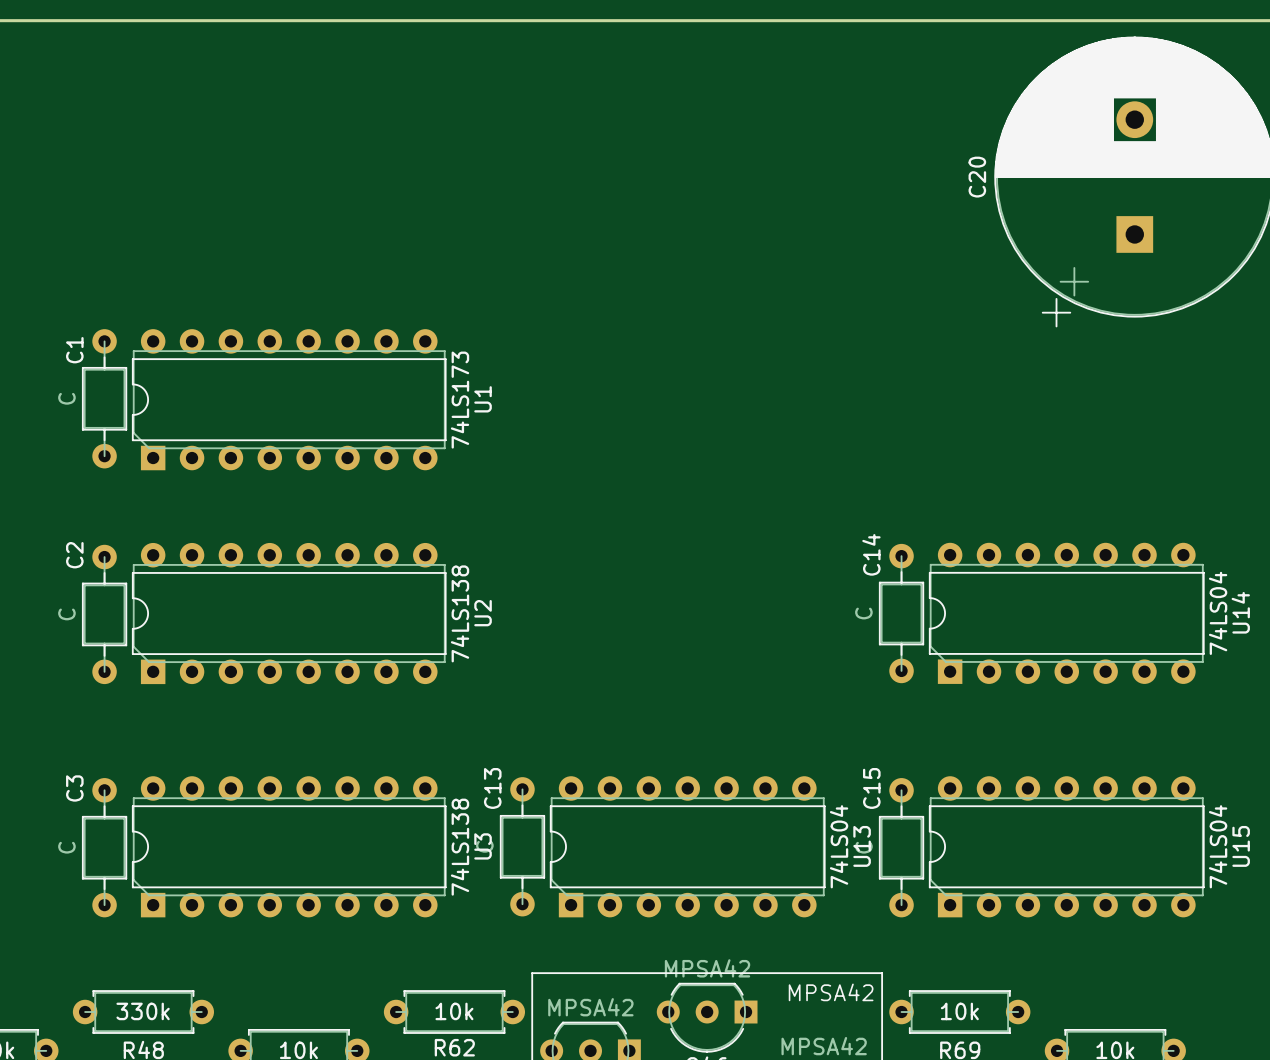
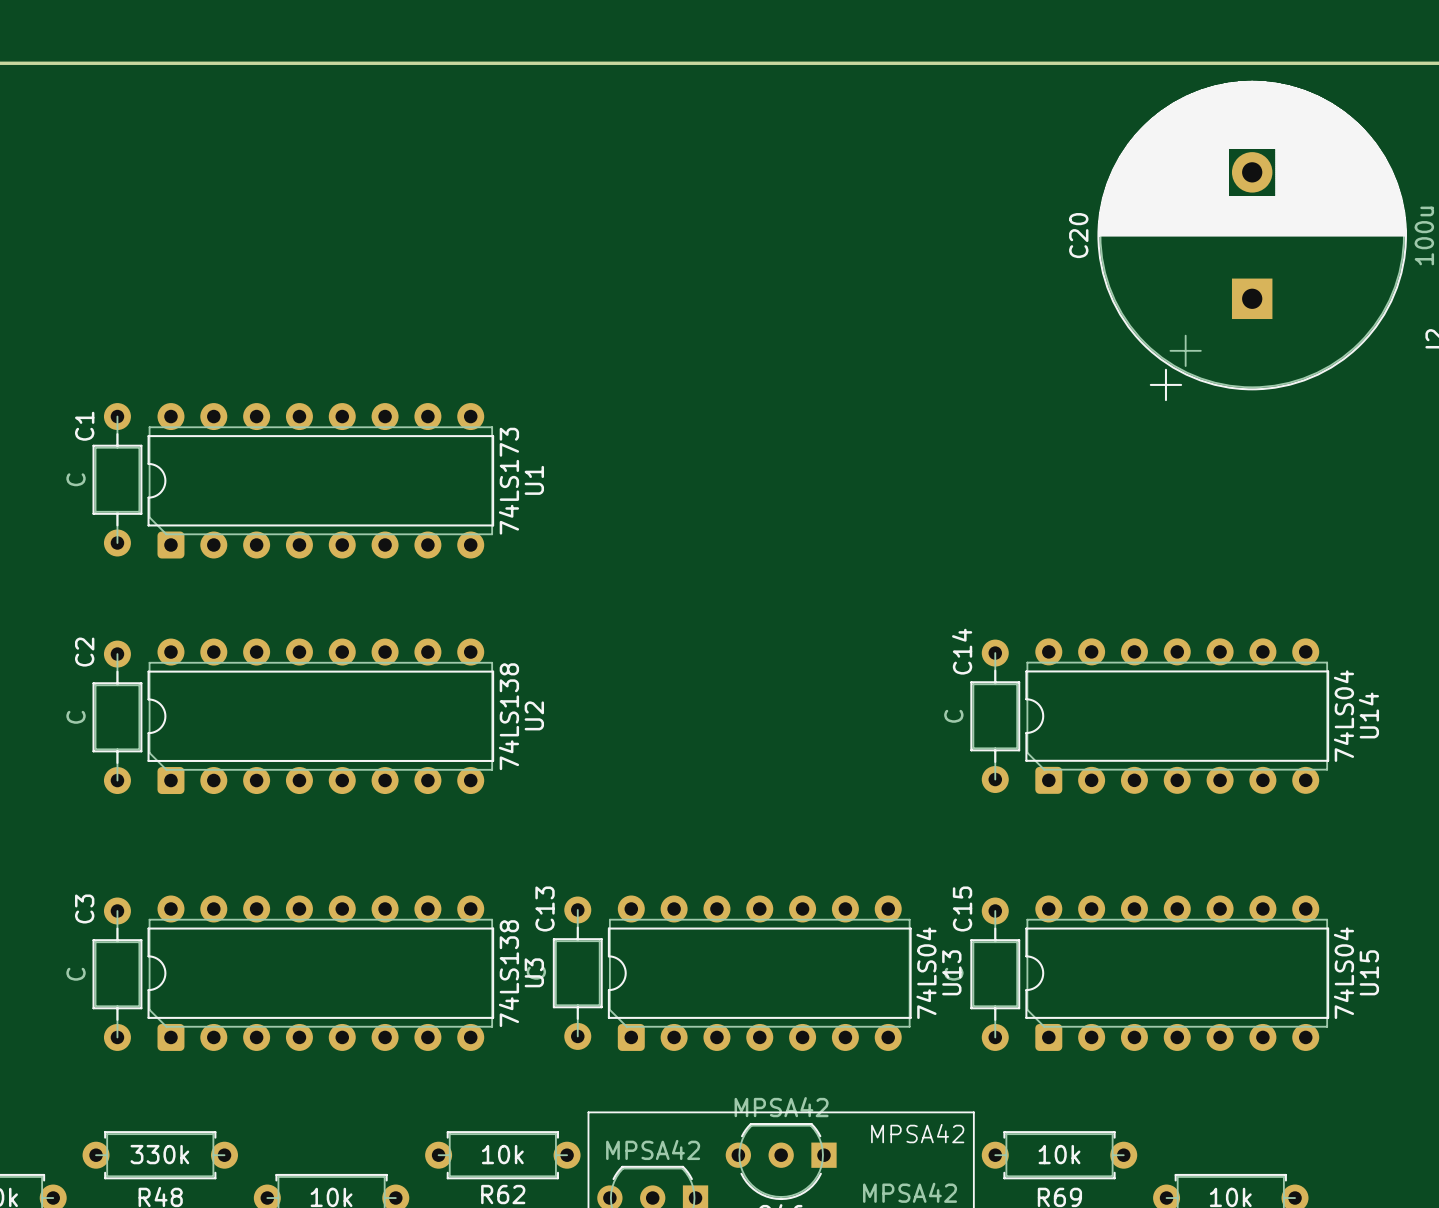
U1 footprint: [131, 329, 447, 471] -> [147, 403, 495, 559]
U2 footprint: [131, 542, 447, 685] -> [147, 638, 495, 795]
U14 footprint: [928, 542, 1205, 684] -> [1025, 638, 1330, 794]
U3 footprint: [131, 776, 447, 918] -> [147, 895, 495, 1051]
U13 footprint: [549, 776, 826, 918] -> [607, 895, 912, 1051]
U15 footprint: [928, 776, 1205, 918] -> [1025, 895, 1330, 1051]

